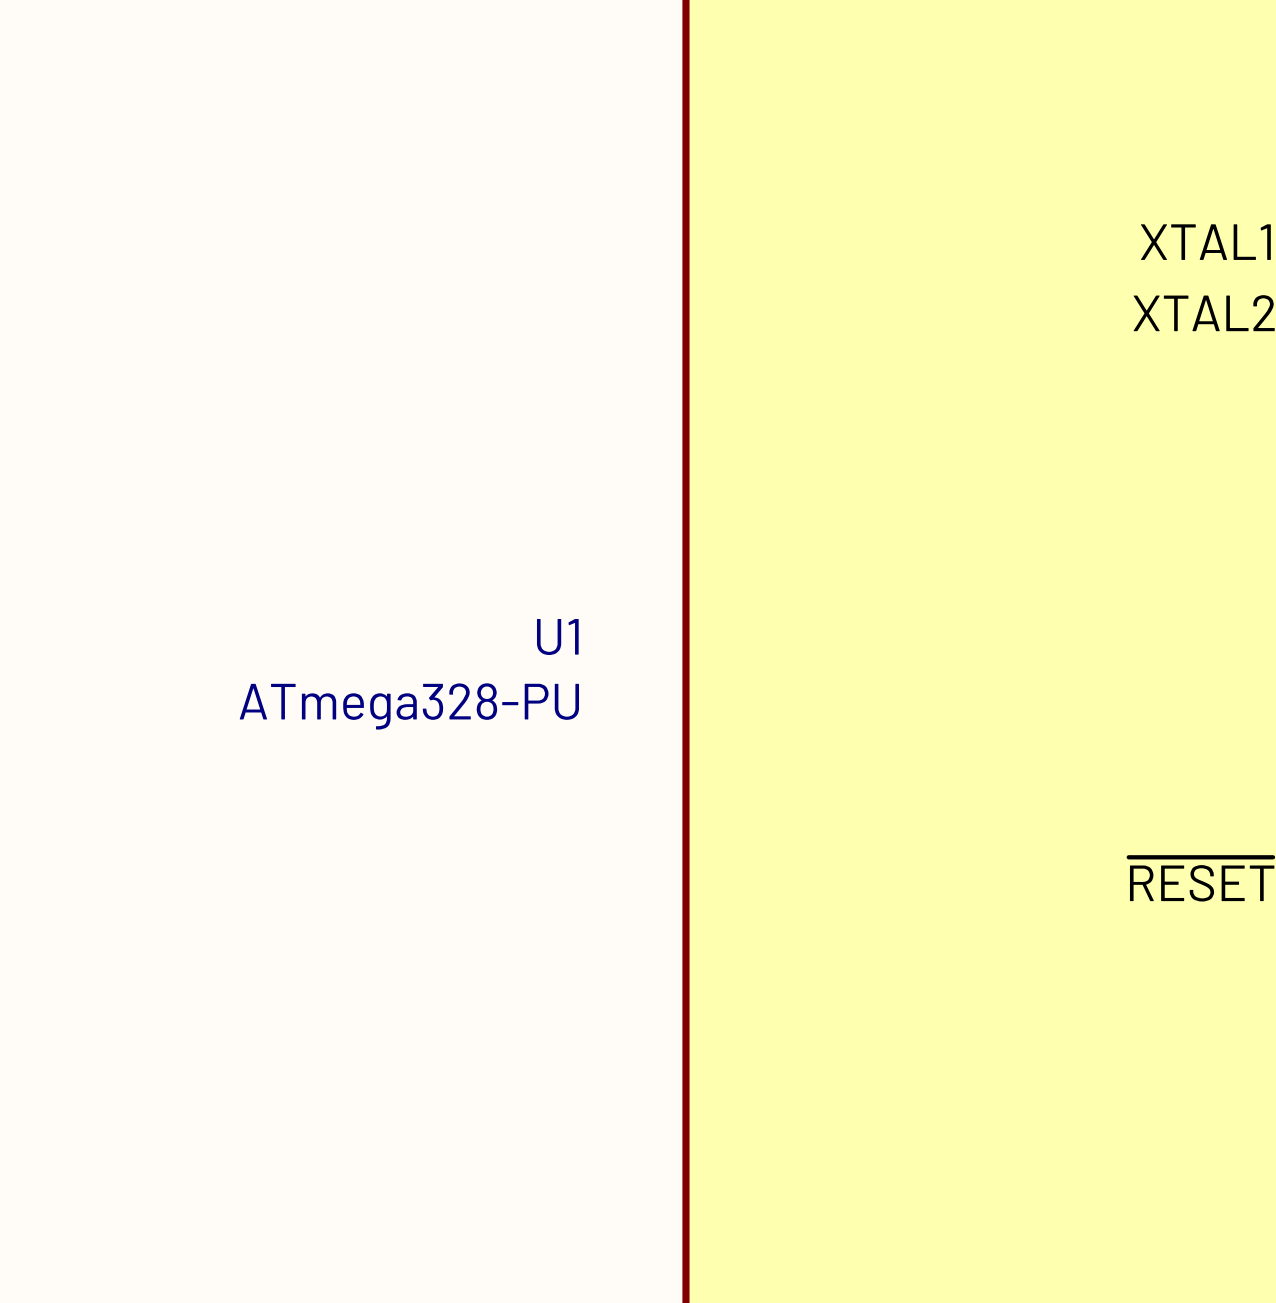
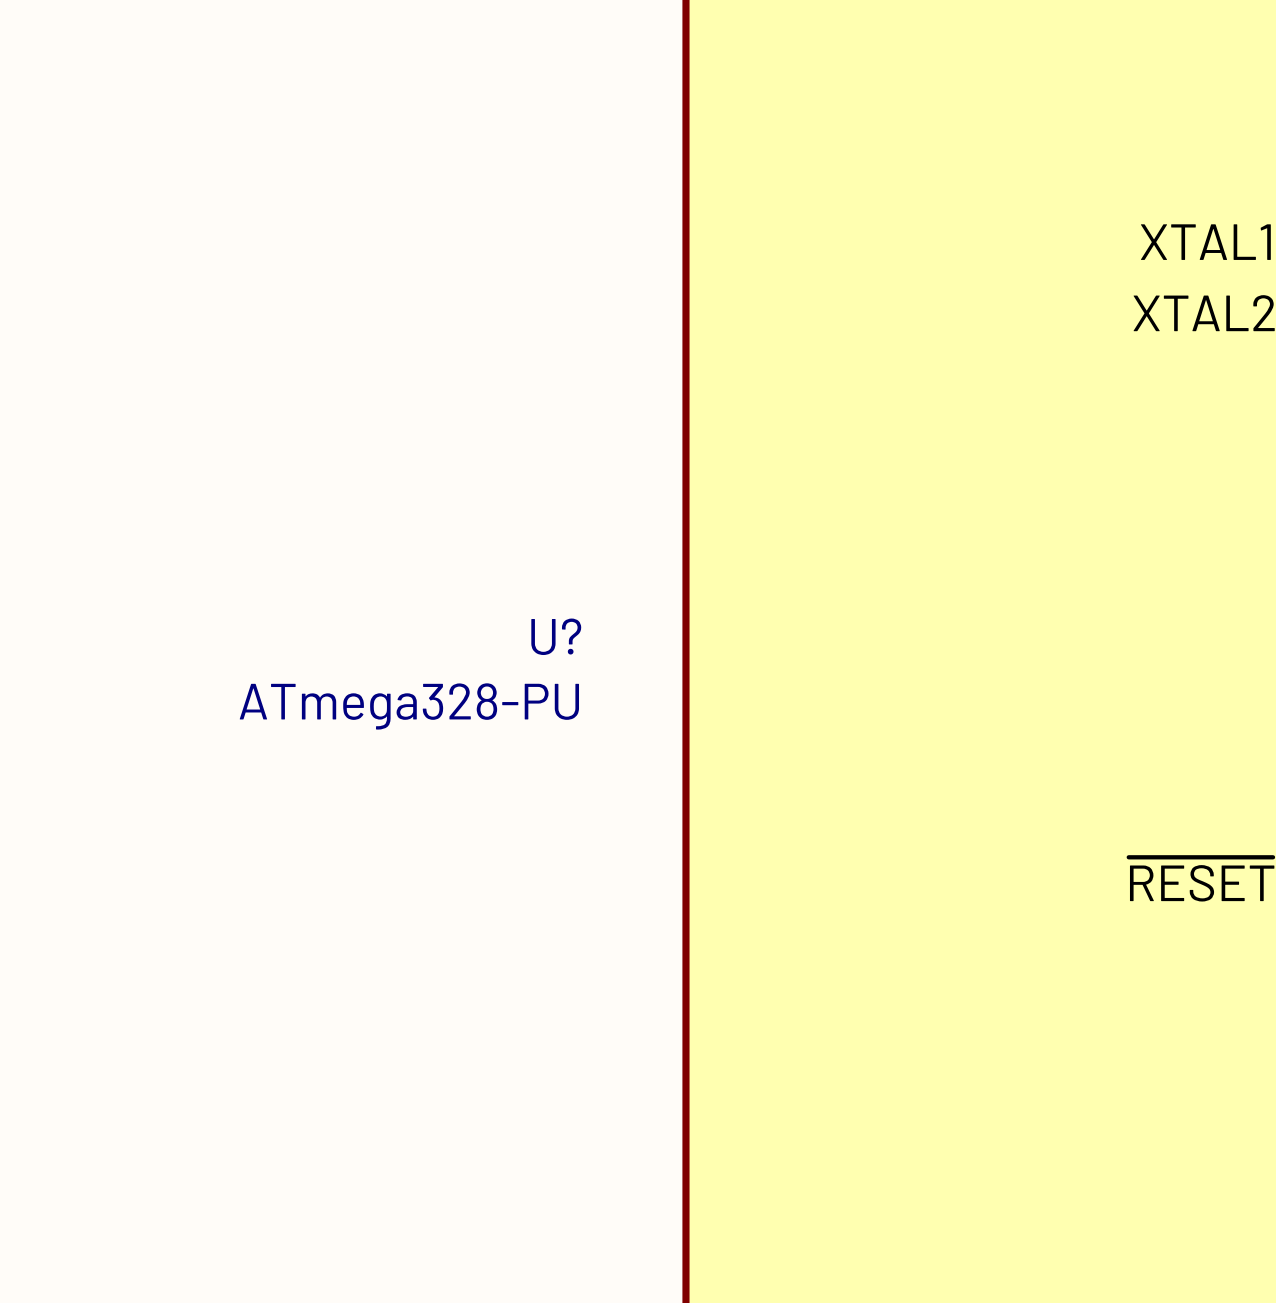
U1 name: U1 (557, 637) -> U? (556, 636)

